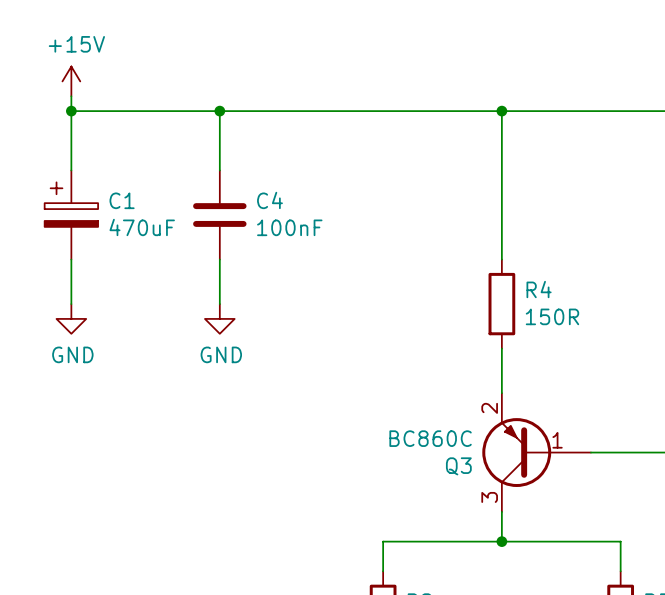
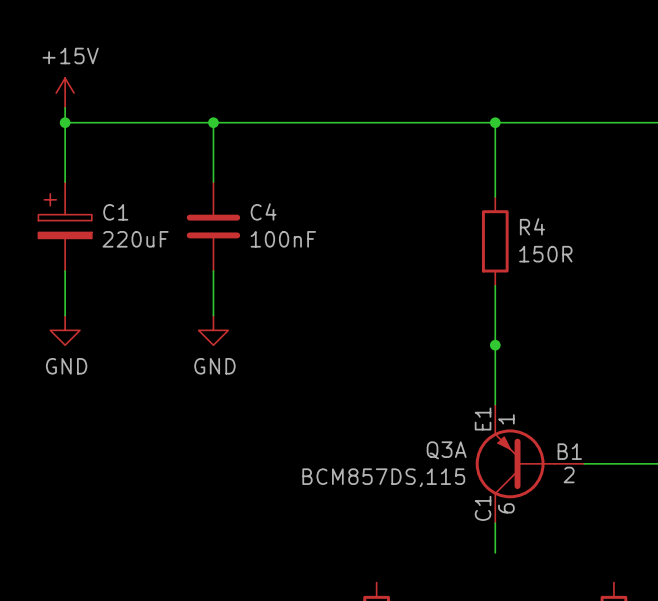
wire: (501, 185) (501, 259) -> (495, 285) (495, 360)
C1 value: 470uF (142, 227) -> 220uF (135, 239)
R4 position: (501, 304) -> (495, 241)
junction: none -> (495, 345)
Q3: BC860C (536, 452) -> none
Q3A: none -> BCM857DS,115 (530, 463)
junction: (501, 541) -> none
wire: (383, 571) (383, 541) (620, 541) (620, 571) -> none

